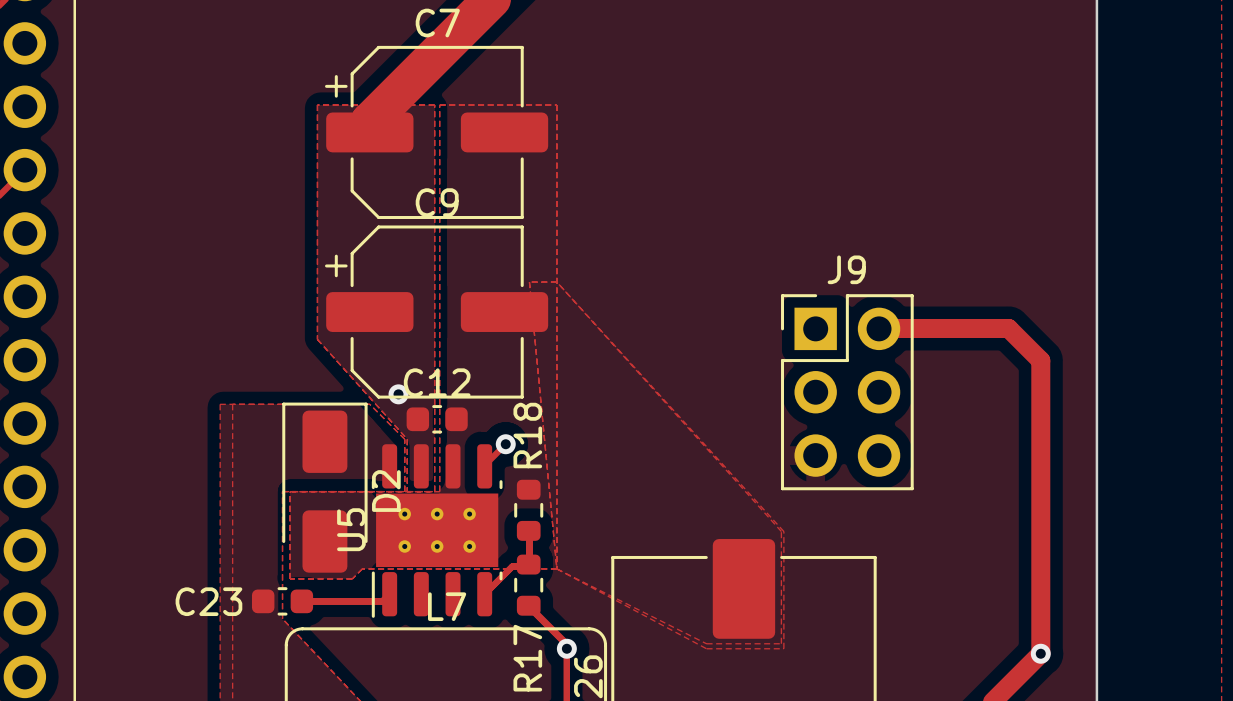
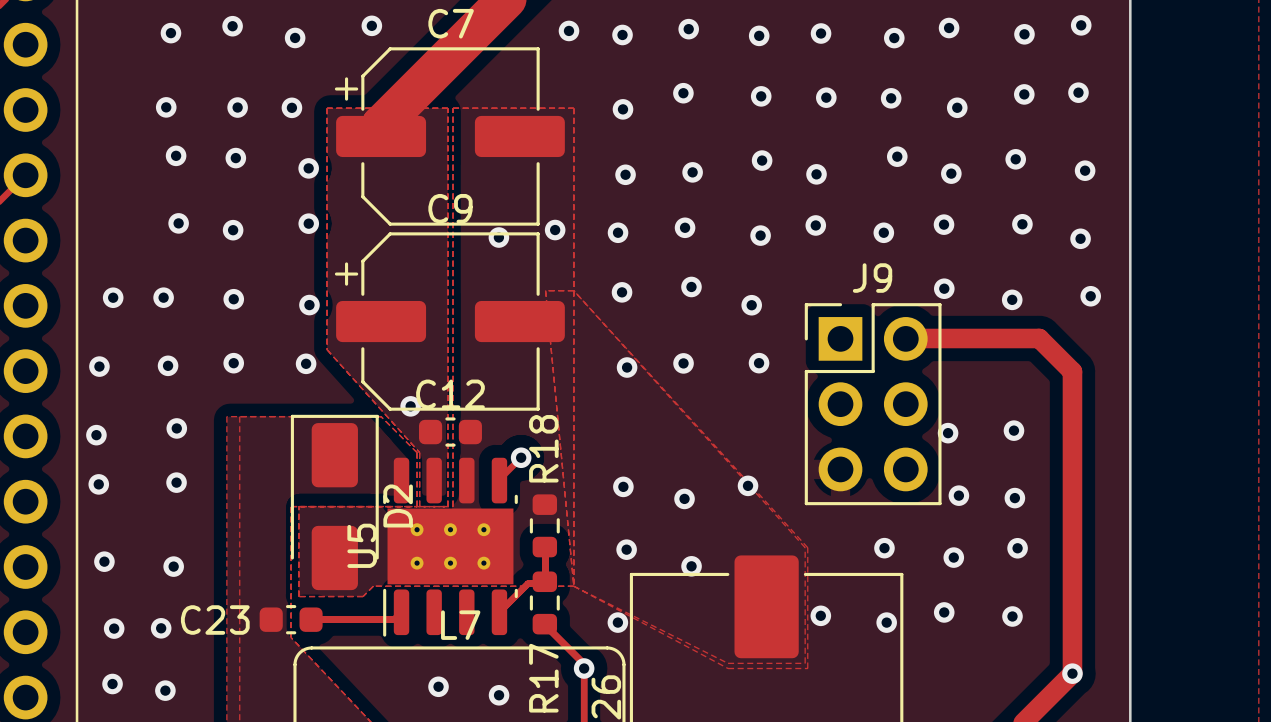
via: none -> (1081, 25)
via: none -> (232, 26)
via: none -> (371, 25)
via: none -> (949, 28)
via: none -> (688, 29)
via: none -> (568, 30)
via: none -> (170, 33)
via: none -> (821, 33)
via: none -> (622, 34)
via: none -> (1024, 34)
via: none -> (759, 35)
via: none -> (295, 37)
via: none -> (894, 38)
via: none -> (1078, 92)
via: none -> (683, 93)
via: none -> (1024, 94)
via: none -> (761, 96)
via: none -> (826, 97)
via: none -> (891, 98)
via: none -> (166, 107)
via: none -> (237, 107)
via: none -> (291, 107)
via: none -> (957, 107)
via: none -> (622, 109)
via: none -> (176, 155)
via: none -> (897, 156)
via: none -> (235, 158)
via: none -> (1015, 159)
via: none -> (762, 160)
via: none -> (308, 168)
via: none -> (1085, 170)
via: none -> (692, 172)
via: none -> (951, 173)
via: none -> (625, 174)
via: none -> (816, 174)
via: none -> (178, 223)
via: none -> (308, 223)
via: none -> (1022, 224)
via: none -> (815, 225)
via: none -> (944, 224)
via: none -> (685, 227)
via: none -> (233, 230)
via: none -> (555, 230)
via: none -> (618, 232)
via: none -> (883, 232)
via: none -> (760, 235)
via: none -> (498, 237)
via: none -> (1080, 238)
via: none -> (691, 286)
via: none -> (944, 288)
via: none -> (622, 292)
via: none -> (1090, 296)
via: none -> (113, 297)
via: none -> (163, 297)
via: none -> (233, 299)
via: none -> (1012, 299)
via: none -> (309, 305)
via: none -> (751, 305)
via: none -> (233, 363)
via: none -> (683, 363)
via: none -> (759, 363)
via: none -> (306, 363)
via: none -> (99, 366)
via: none -> (168, 365)
via: none -> (627, 367)
via: none -> (176, 428)
via: none -> (1013, 430)
via: none -> (948, 433)
via: none -> (96, 435)
via: none -> (176, 482)
via: none -> (98, 484)
via: none -> (748, 485)
via: none -> (623, 486)
via: none -> (958, 495)
via: none -> (1014, 498)
via: none -> (684, 498)
via: none -> (884, 548)
via: none -> (1017, 548)
via: none -> (626, 549)
via: none -> (953, 557)
via: none -> (104, 561)
via: none -> (173, 566)
via: none -> (691, 566)
via: none -> (944, 612)
via: none -> (820, 615)
via: none -> (1012, 616)
via: none -> (617, 622)
via: none -> (886, 622)
via: none -> (161, 628)
via: none -> (114, 628)
via: none -> (112, 684)
via: none -> (438, 686)
via: none -> (165, 690)
via: none -> (499, 695)

